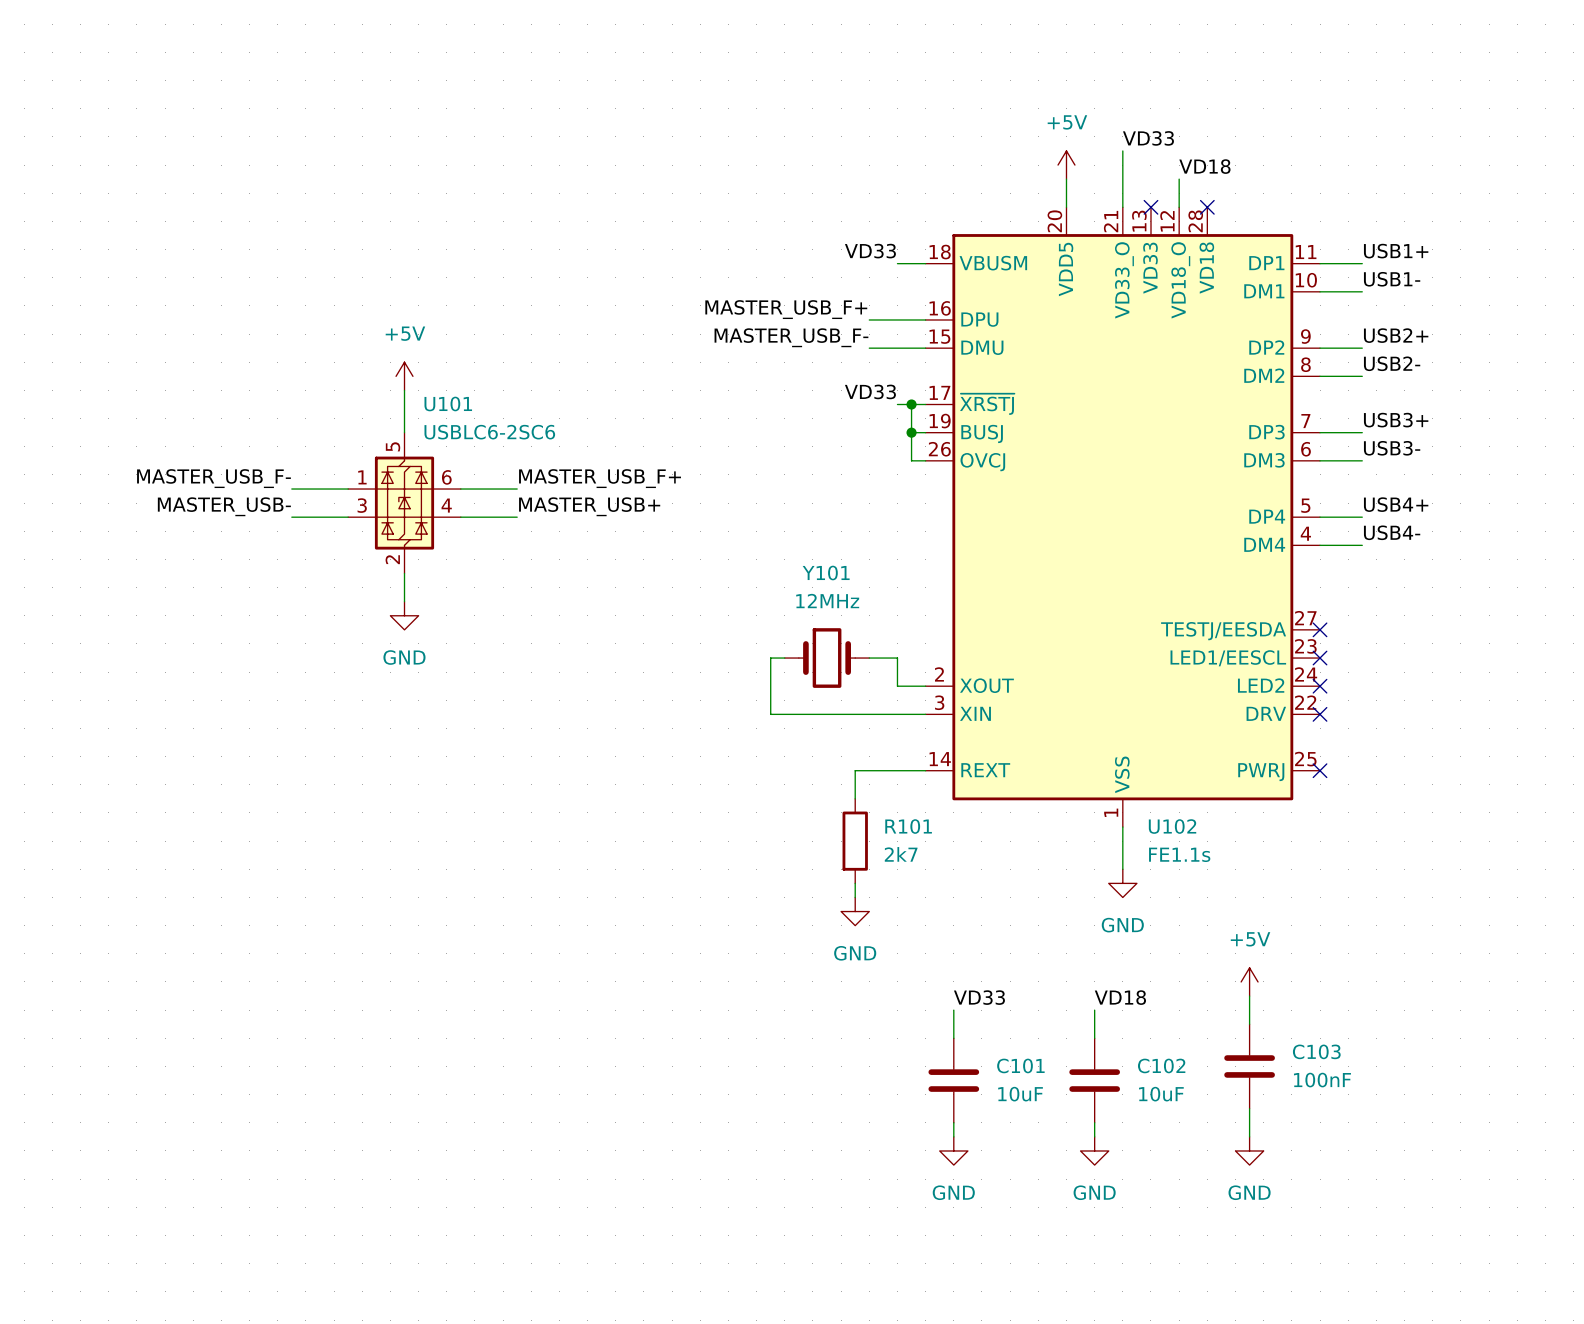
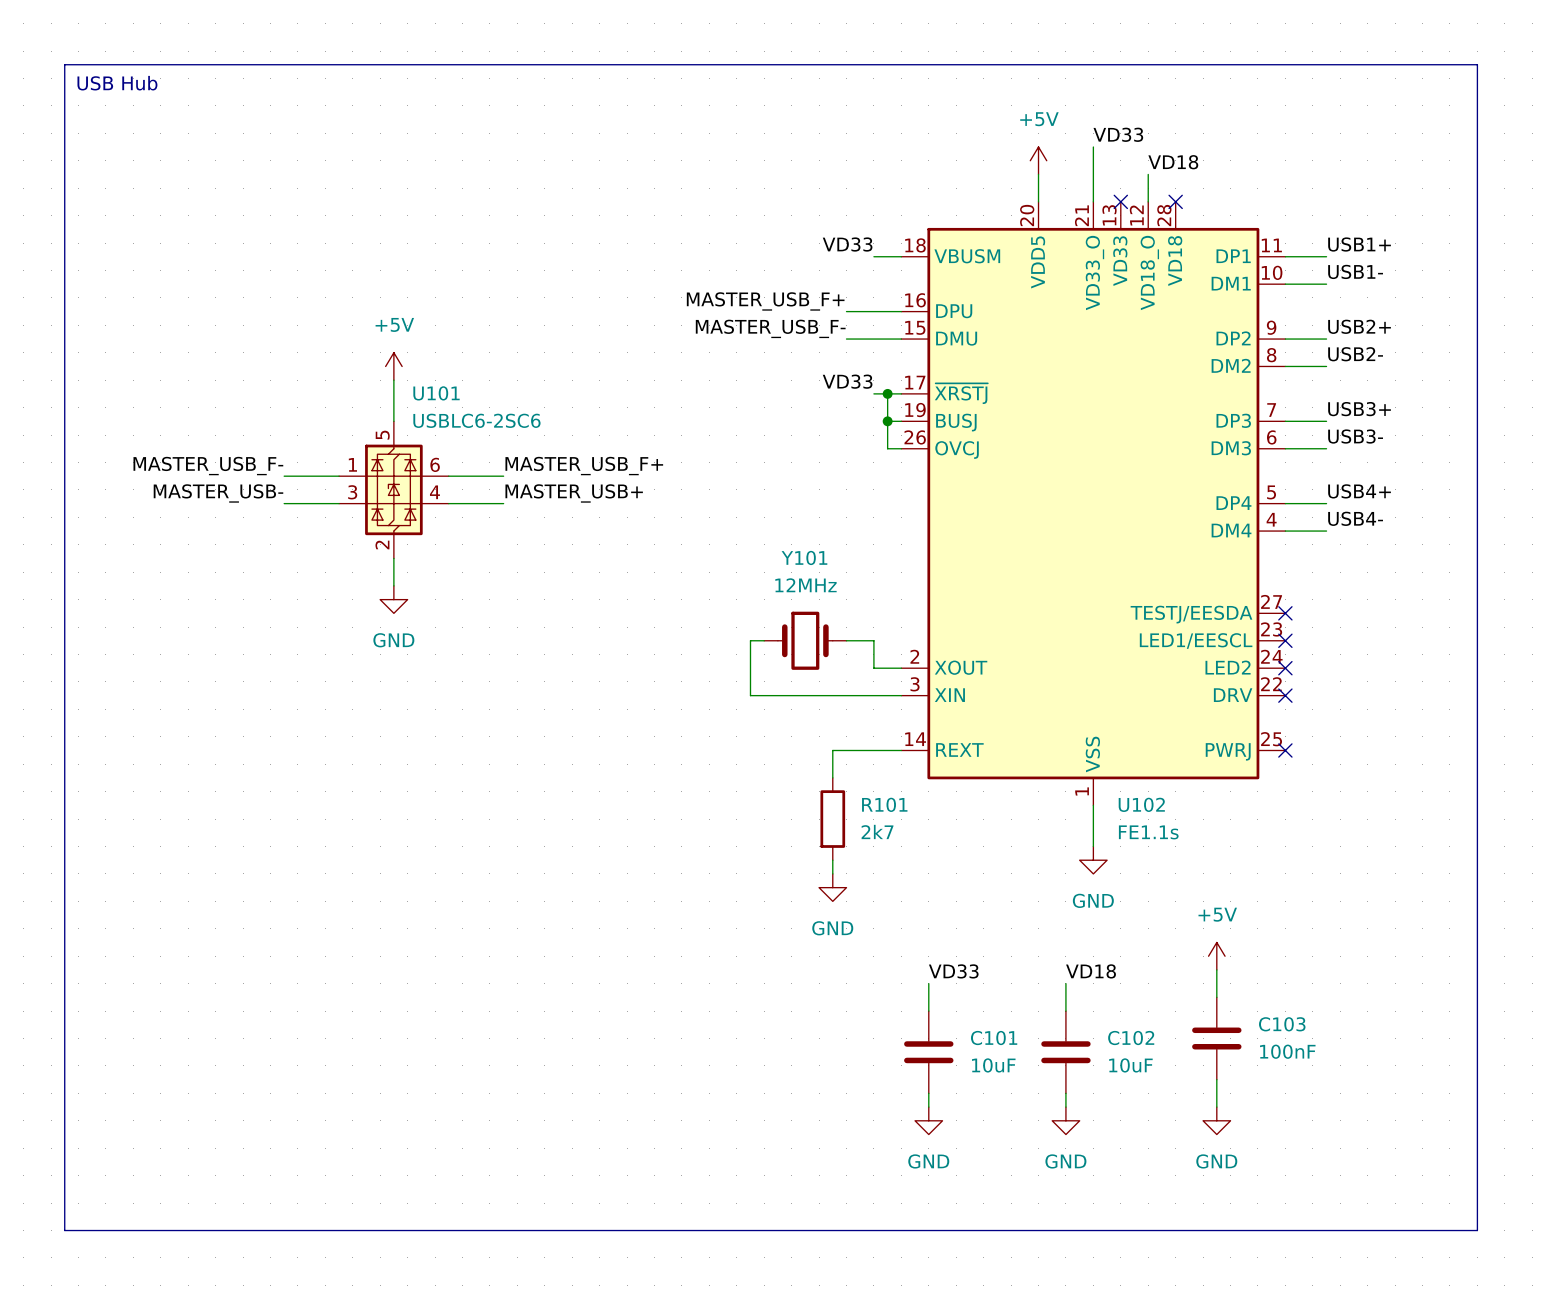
line: none -> (64, 64) (1477, 64) (1477, 1230) (64, 1230) (64, 64)
text: none -> USB Hub (117, 83)

